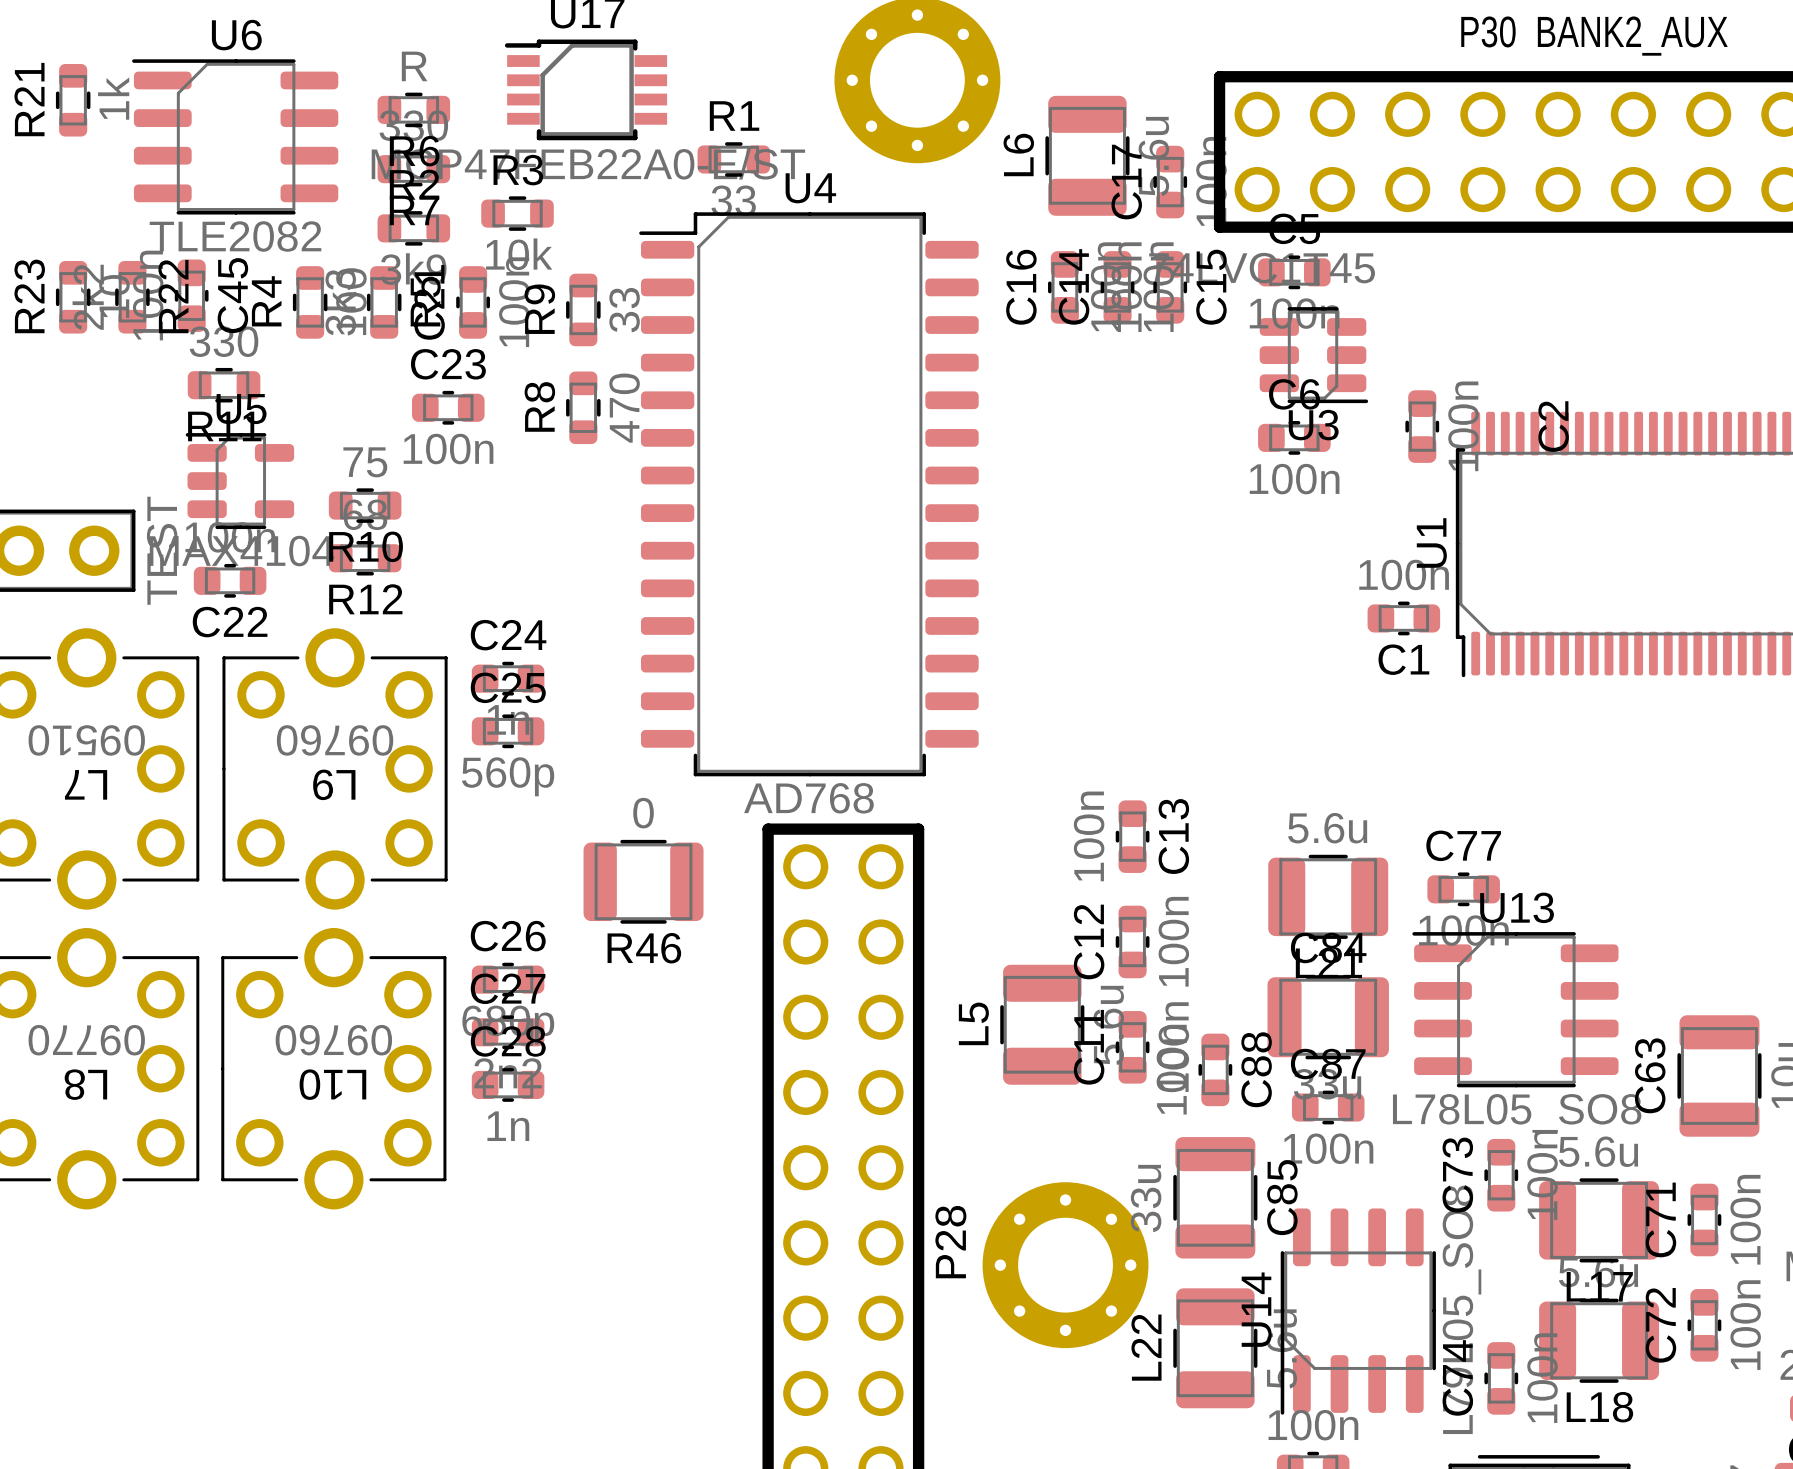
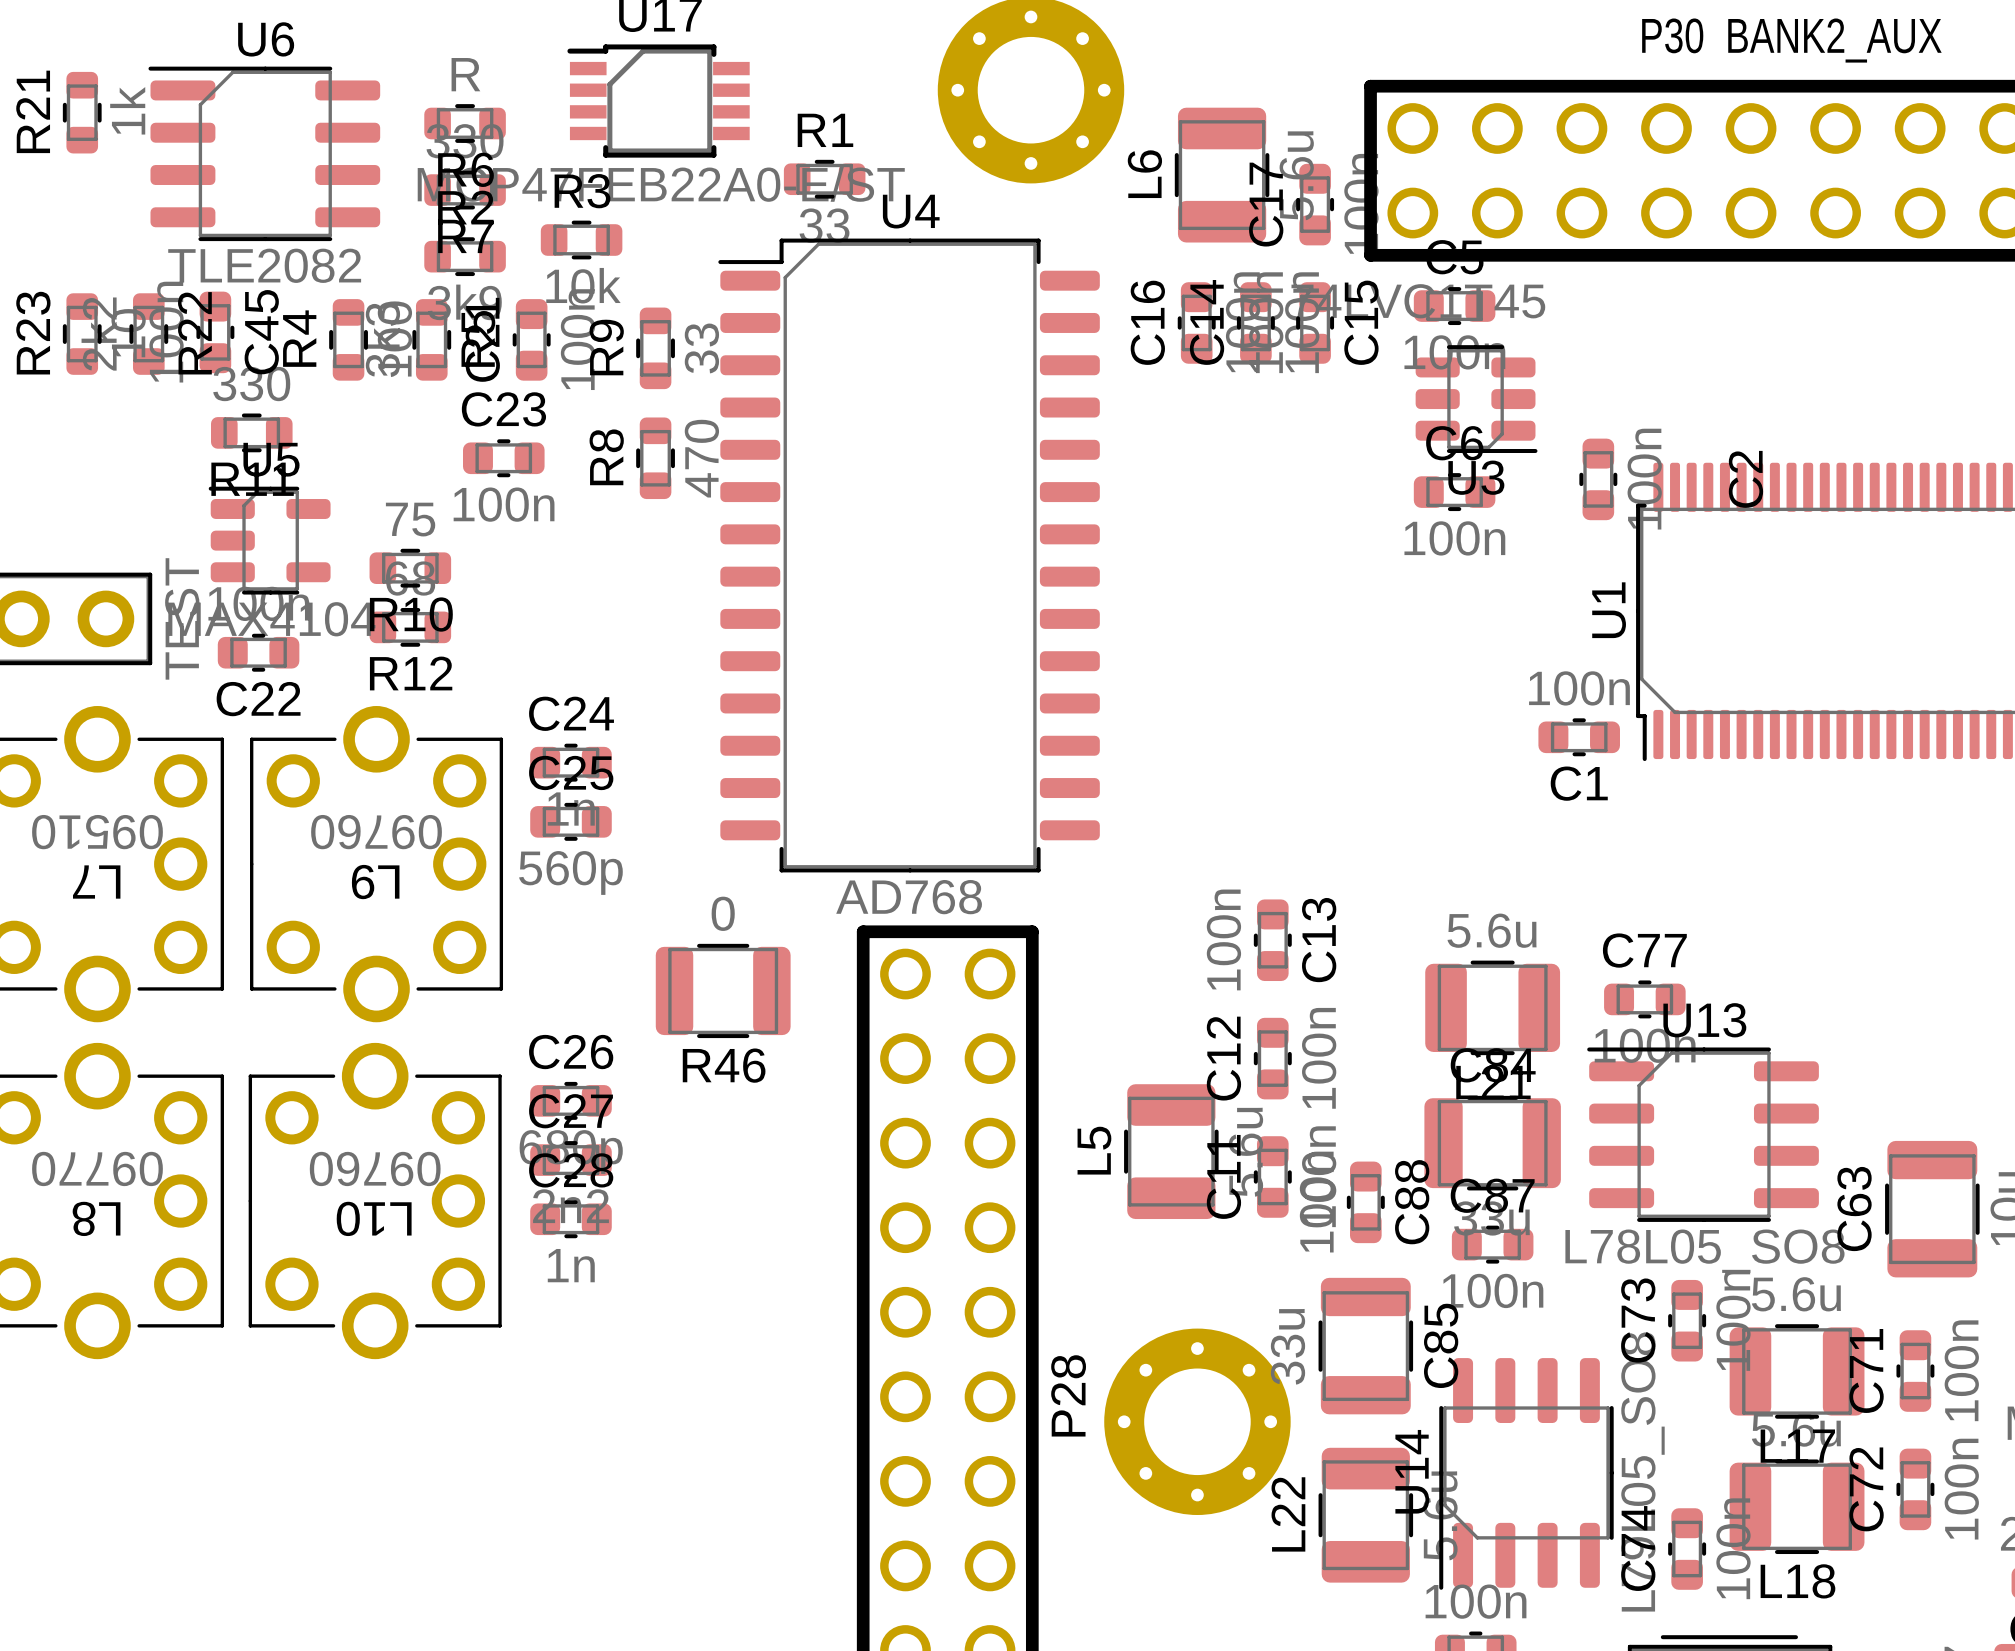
C1 position: (1403, 618) -> (1579, 737)

